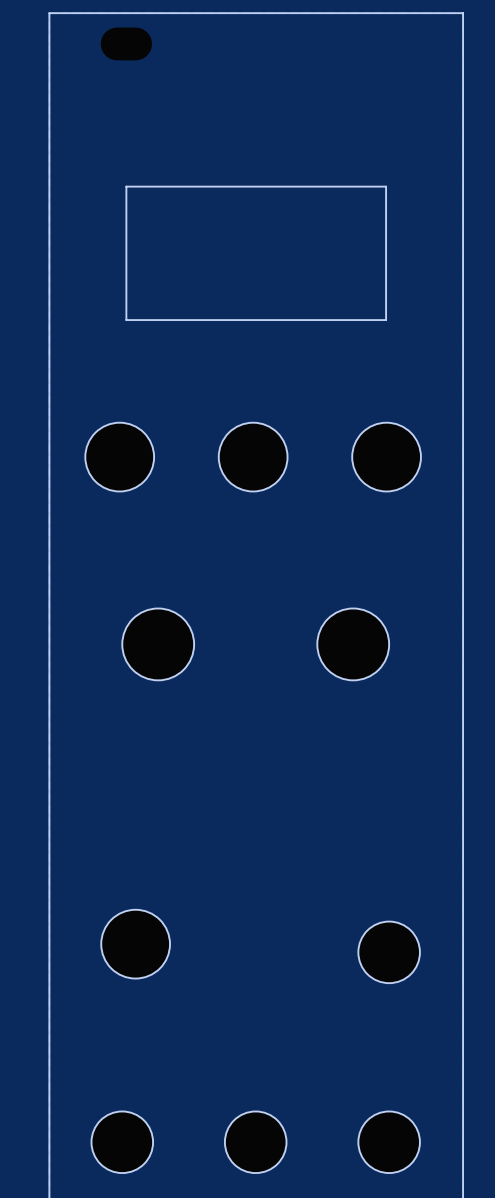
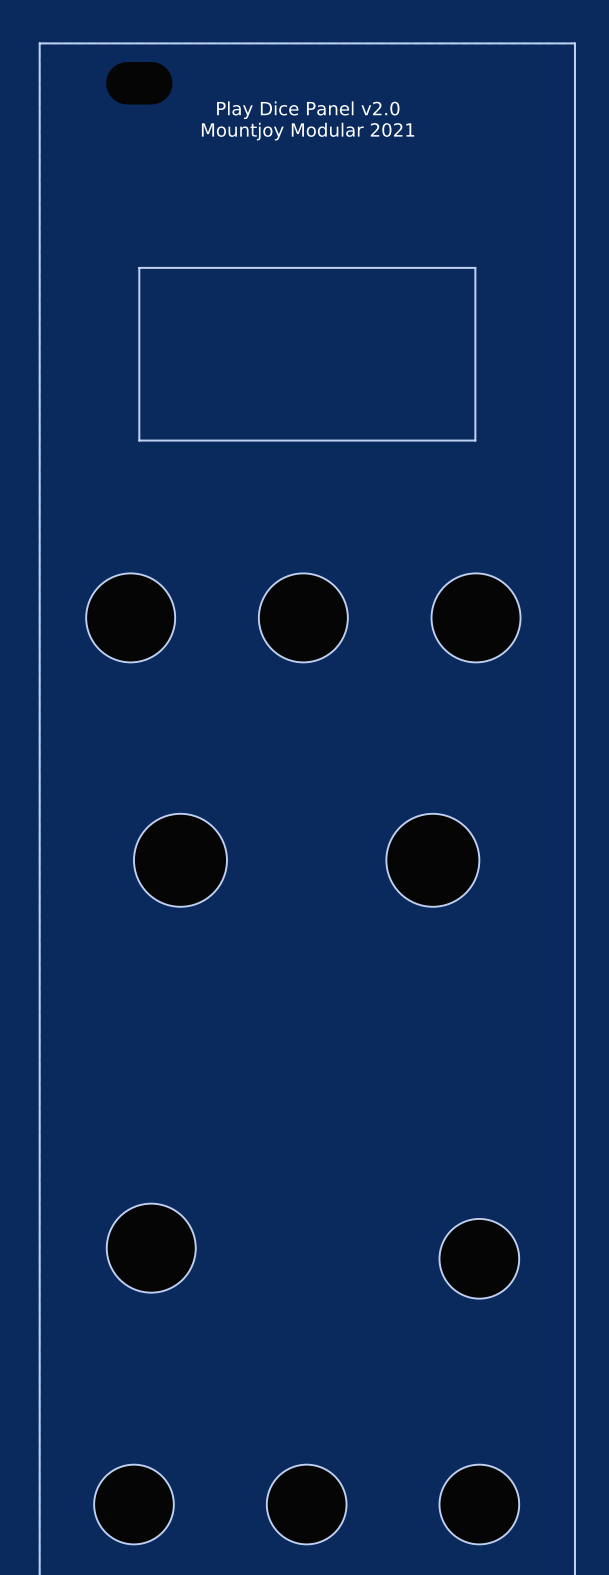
text: none -> Play Dice Panel v2.0 (308, 110)
text: none -> Mountjoy Modular 2021 (308, 131)

